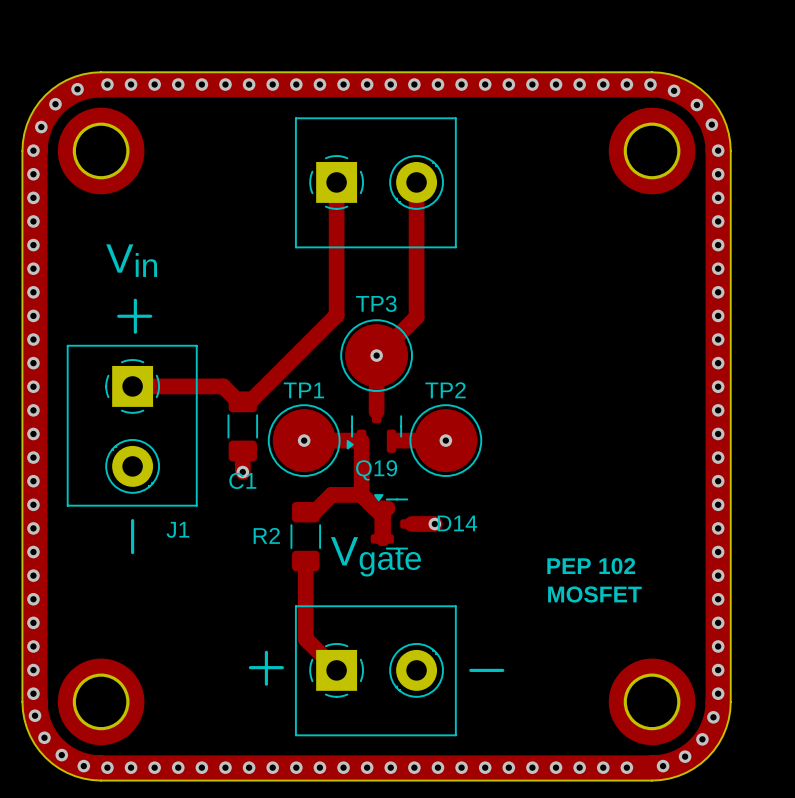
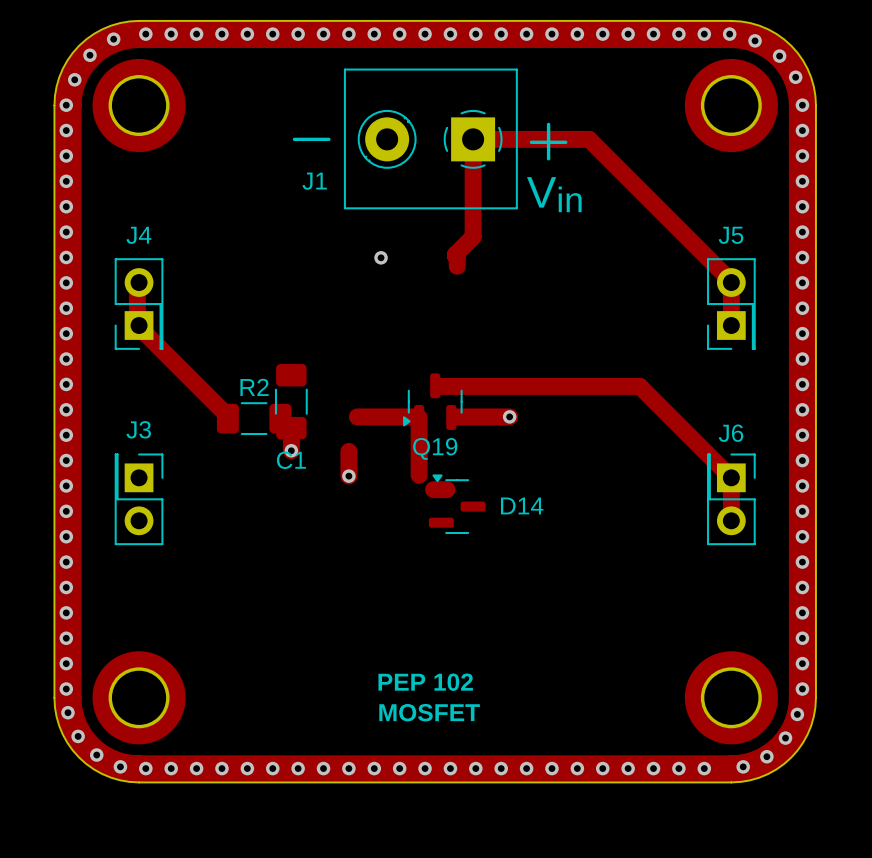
track: (336, 180) (336, 315) (250, 401) (239, 402) (223, 386) (134, 387) -> none
track: none -> (472, 137) (473, 236) (455, 254) (457, 266)
track: (417, 180) (416, 317) (376, 357) (376, 411) -> none
part: (375, 182) -> none
track: none -> (473, 139) (589, 139) (731, 281) (731, 325)
J1 text position: Vin (131, 260) -> Vin (554, 194)
via: none -> (381, 257)
track: none -> (139, 281) (137, 283) (137, 325) (227, 416) (227, 418)
J4: none -> (139, 304)
J5: none -> (731, 304)
TP3: (376, 355) -> none
via: (376, 355) -> none
track: none -> (440, 386) (639, 386) (731, 477) (731, 520)
J1 rotation: 0° (132, 426) -> 90° clockwise (430, 138)
J1 position: (132, 426) -> (430, 138)
TP1: (304, 440) -> none
via position: (304, 440) -> (348, 476)
TP2: (445, 440) -> none
track: none -> (348, 451) (348, 476)
track: (382, 509) (382, 537) (382, 538) (382, 516) (361, 494) (331, 494) (313, 512) -> none
J3: none -> (139, 499)
J6: none -> (731, 499)
track: (411, 524) (434, 524) -> none
via: (434, 524) -> none
R2 rotation: 0° (305, 536) -> 90° clockwise (254, 418)
R2 position: (305, 536) -> (254, 418)
text position: PEP 102 (591, 566) -> PEP 102 (425, 682)
track: (305, 568) (305, 638) (335, 668) -> none
text position: MOSFET (594, 594) -> MOSFET (429, 712)
part: (376, 670) -> none

